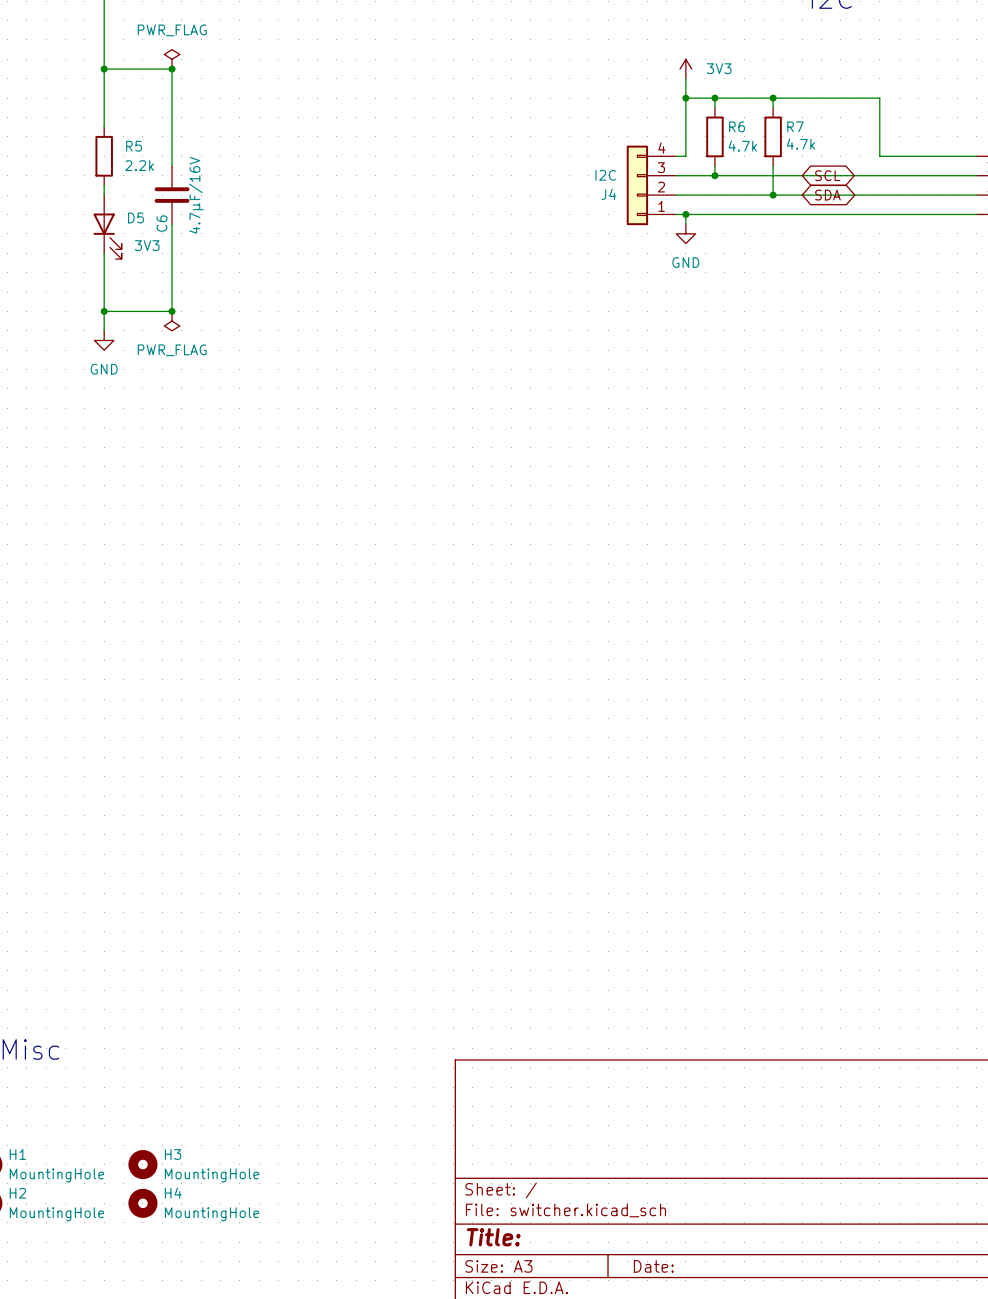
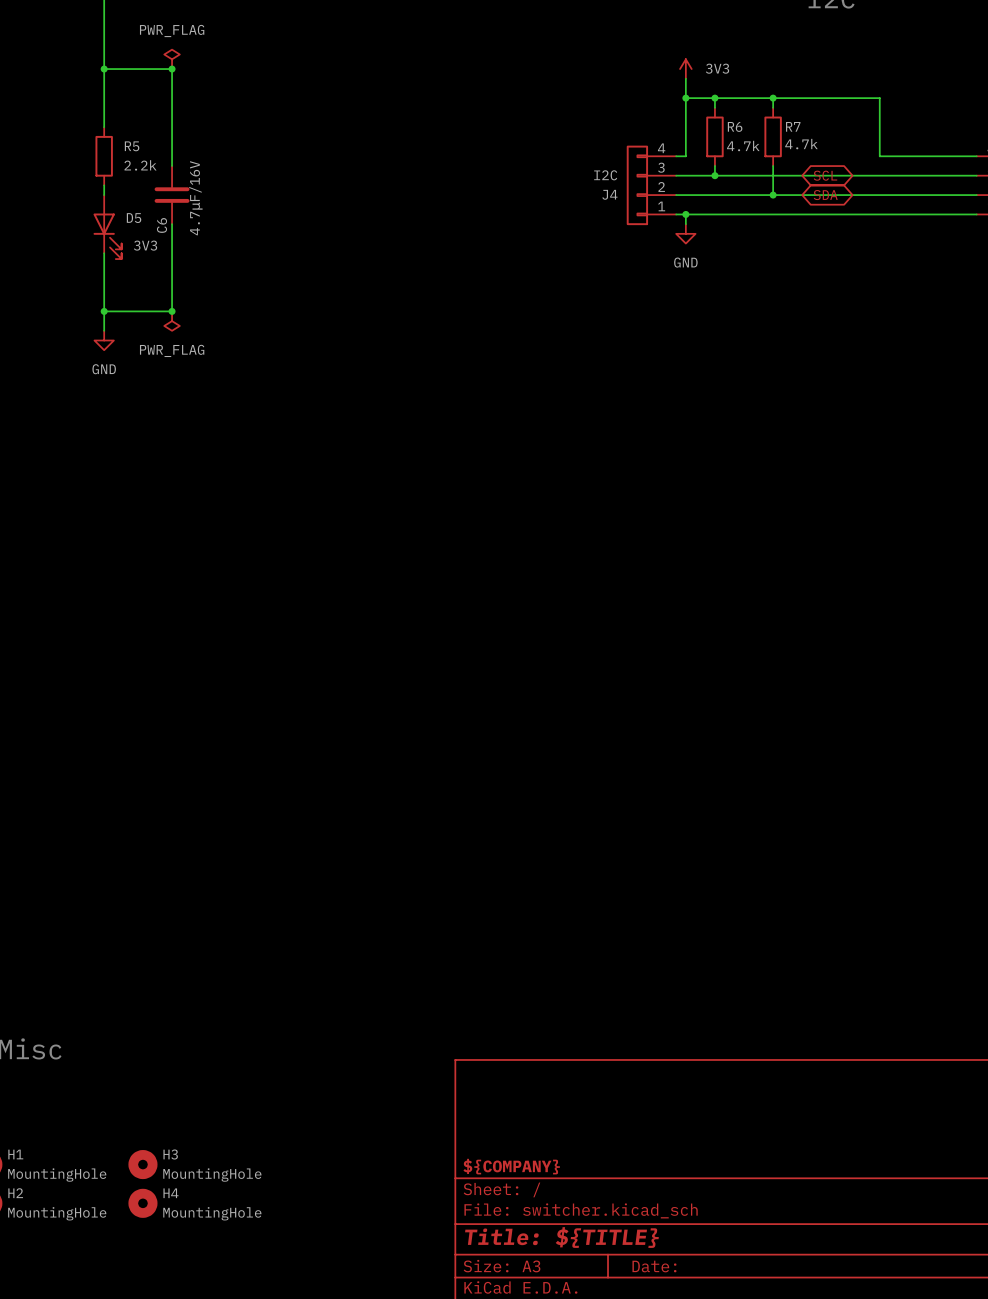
title block: none -> ${COMPANY} (511, 1166)
title block: Title: (493, 1237) -> Title: ${TITLE} (561, 1237)

